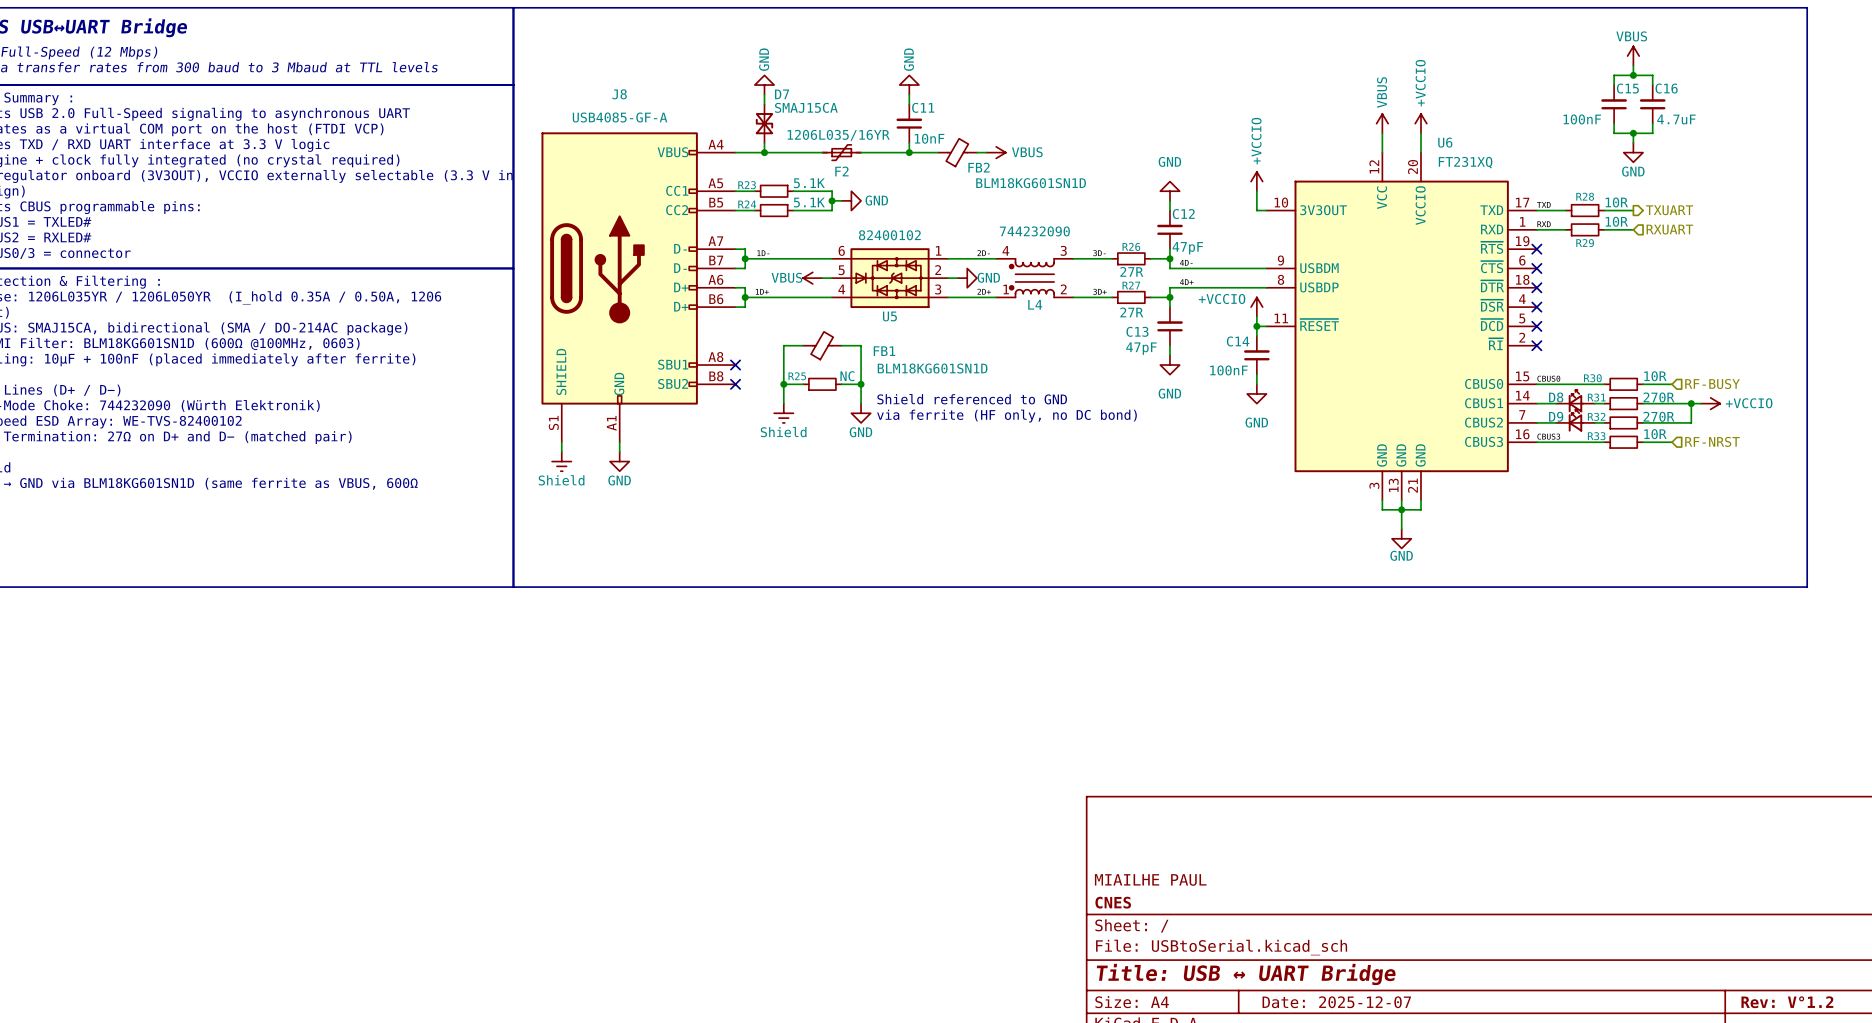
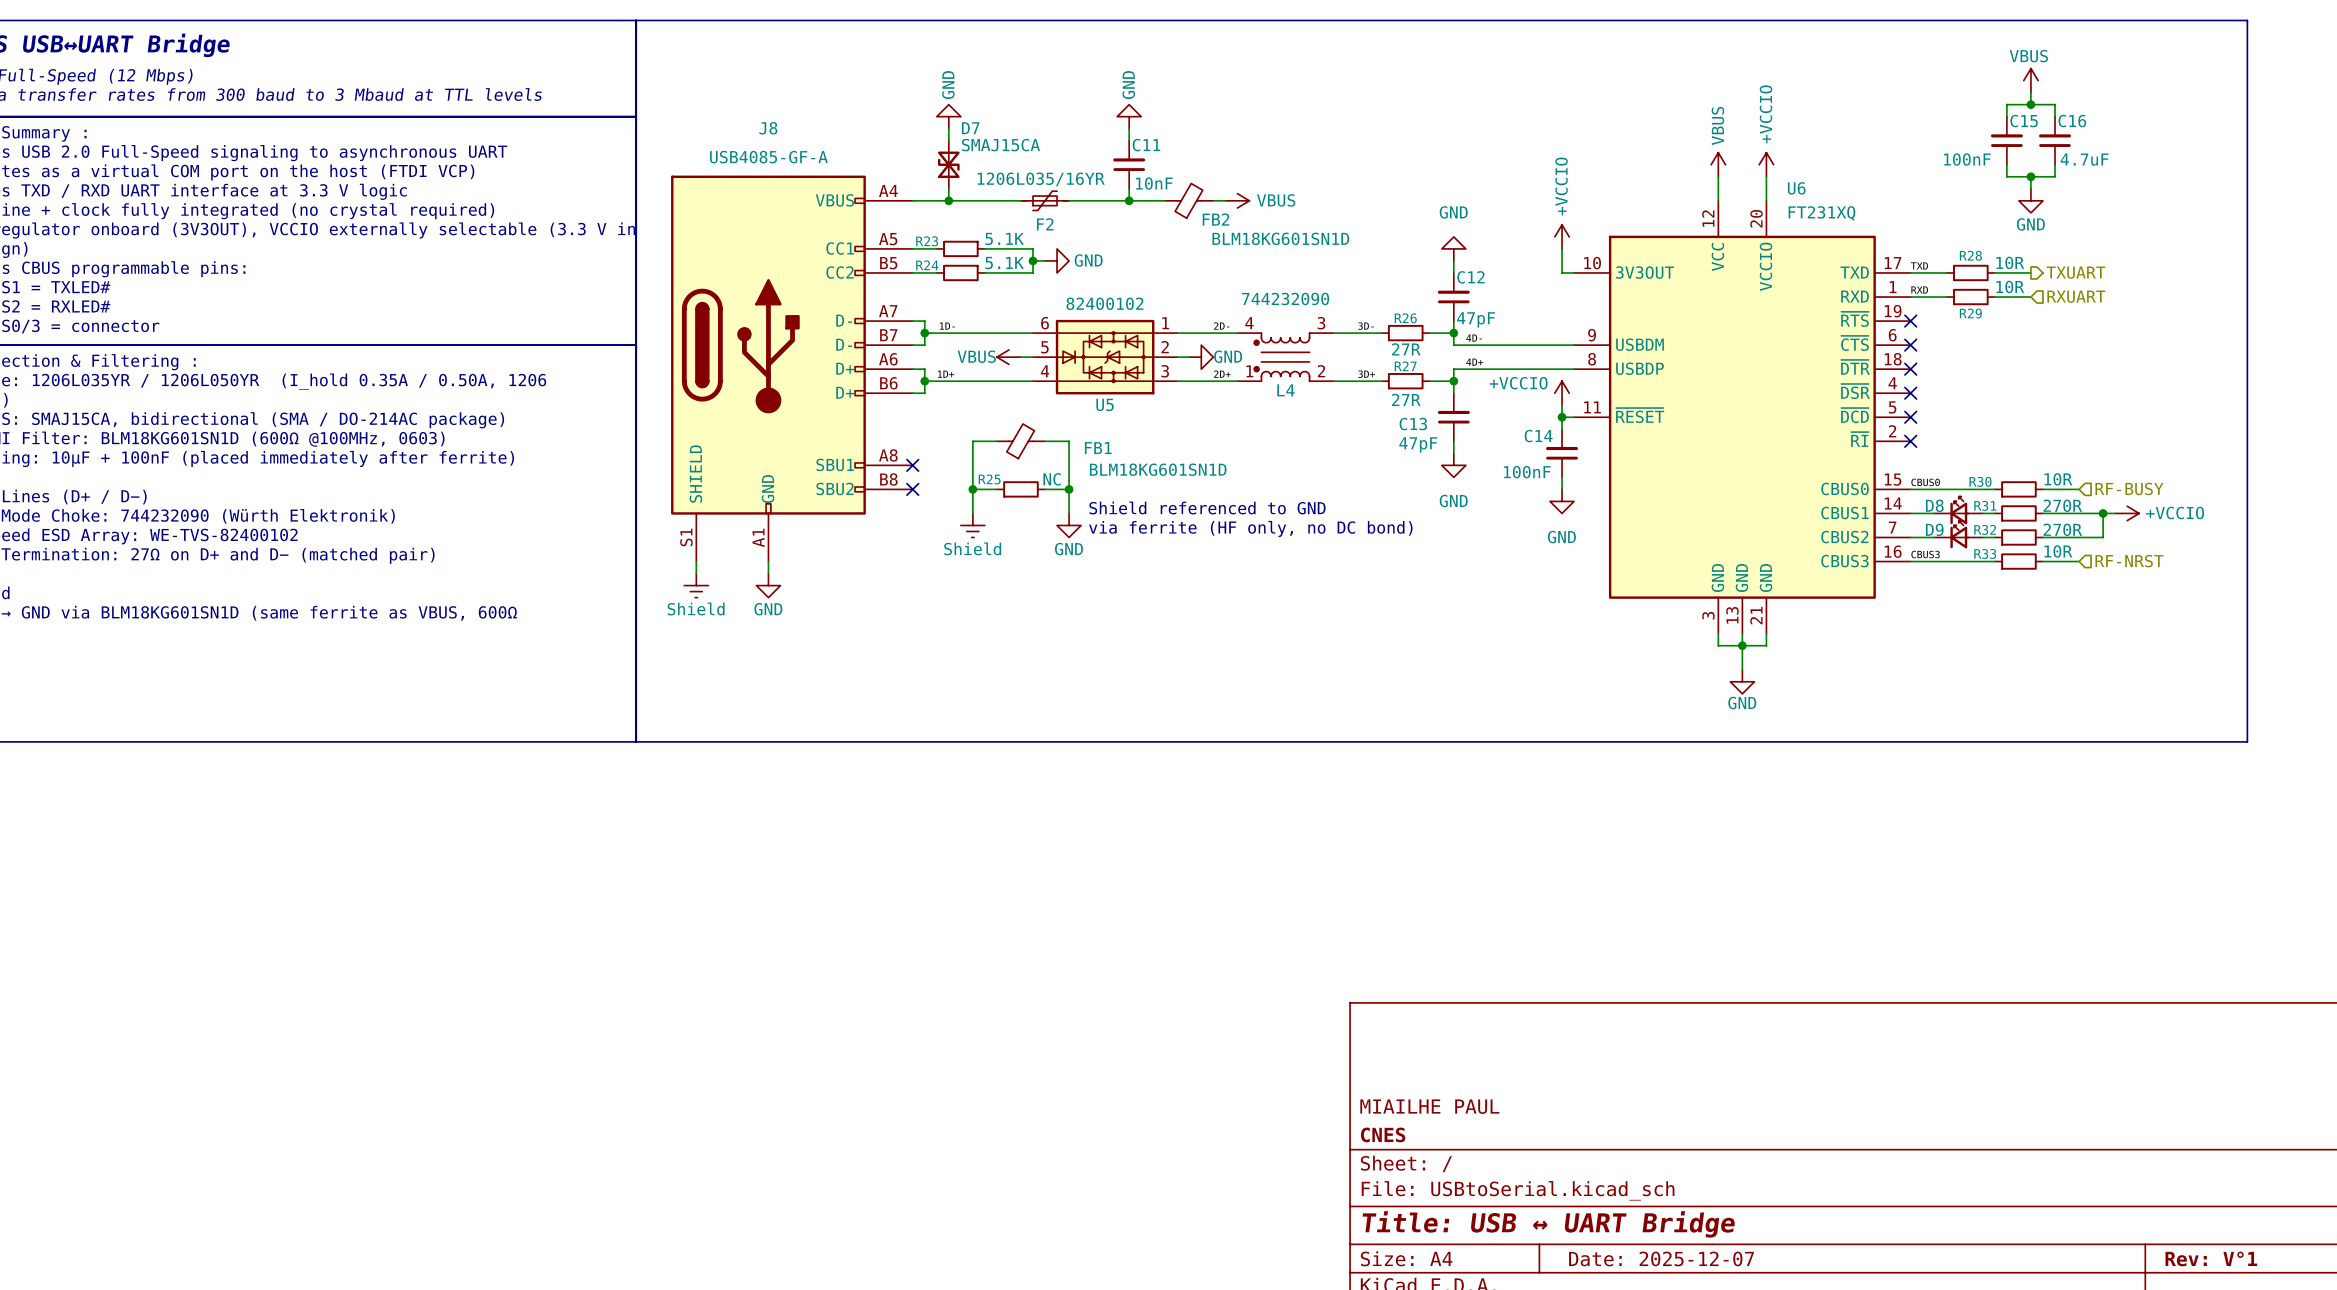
title block: Rev: V°1.2 (1787, 1002) -> Rev: V°1 (2211, 1258)

